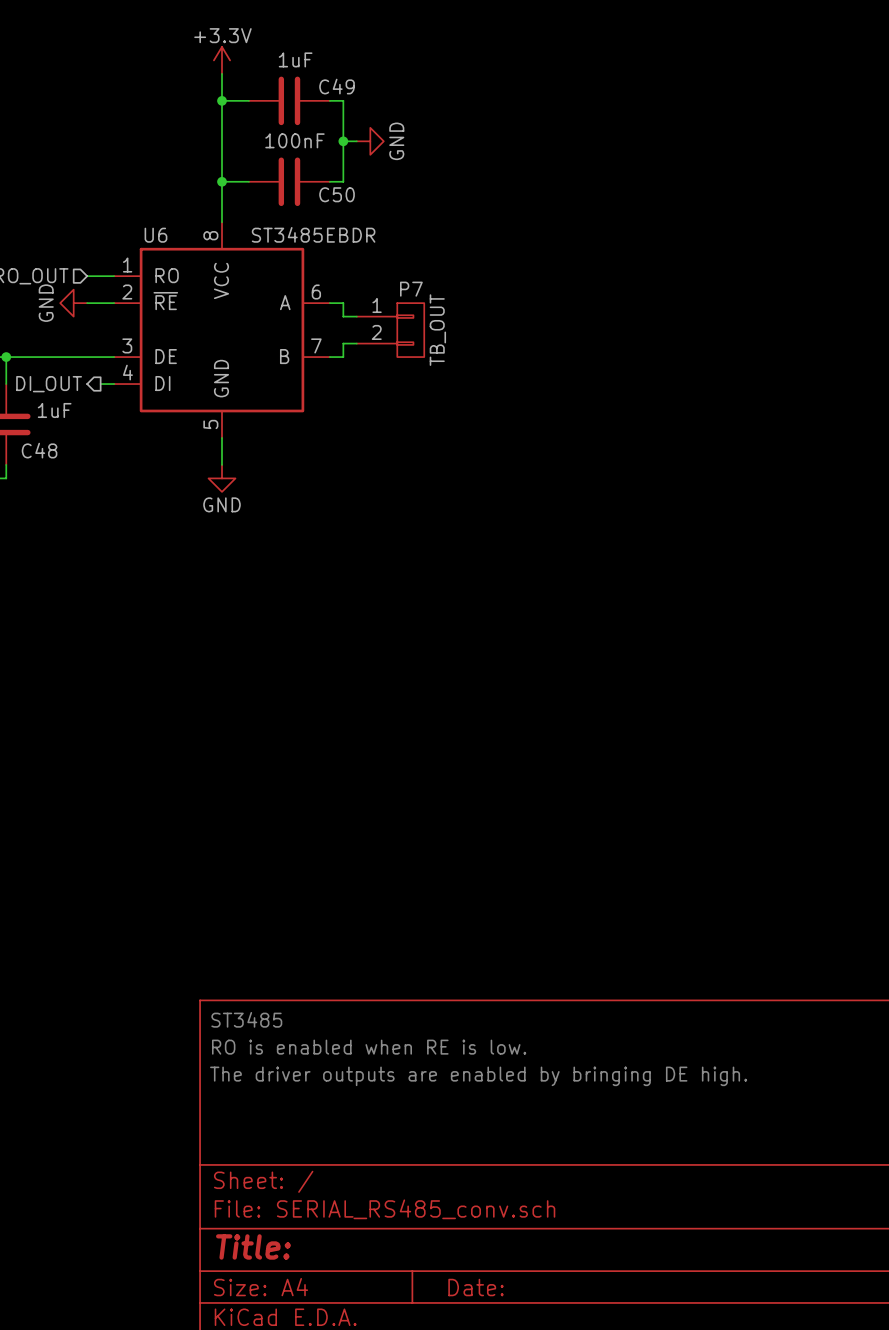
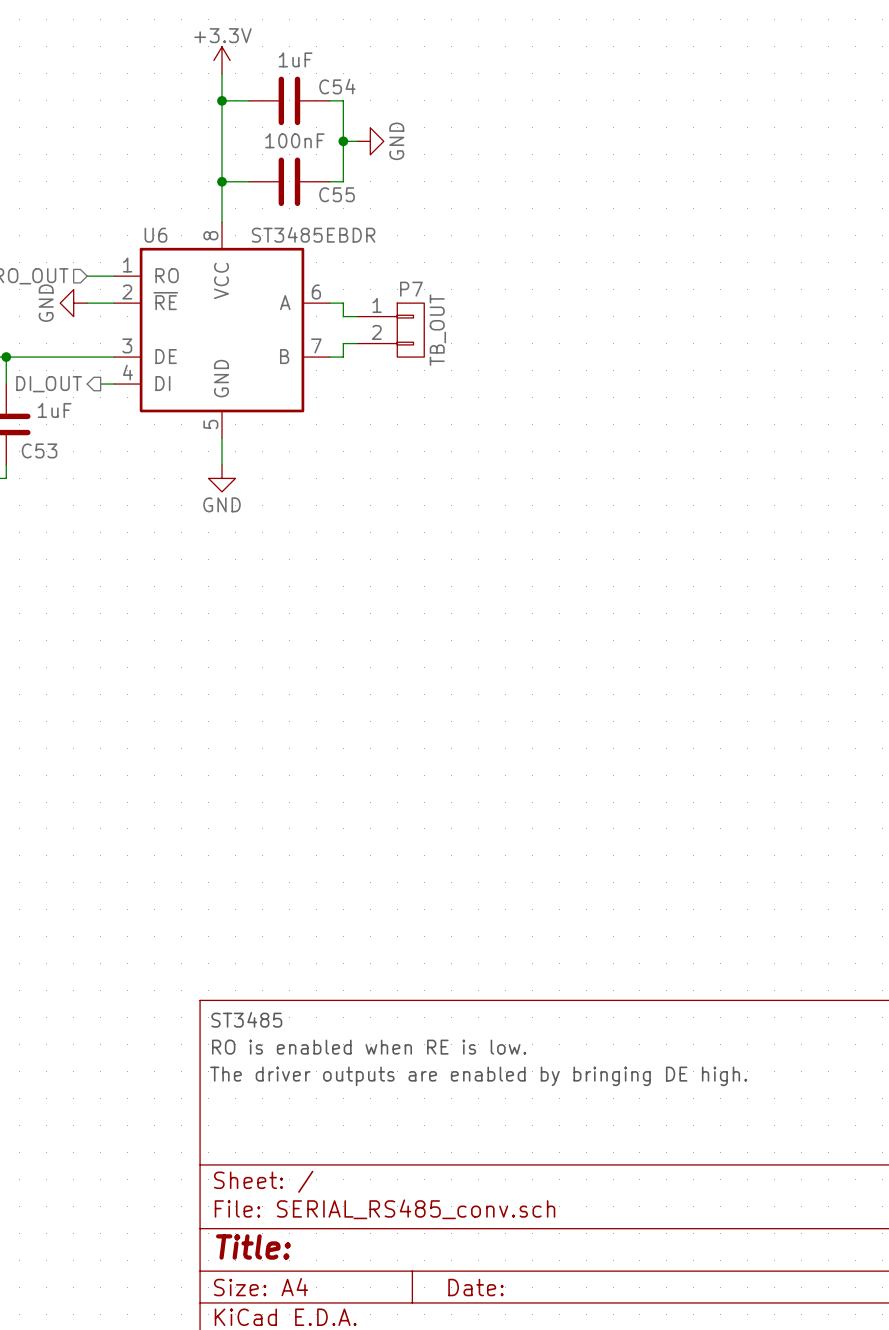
C49 name: C49 (337, 86) -> C54 (337, 86)
C50 name: C50 (337, 194) -> C55 (337, 194)
C48 name: C48 (39, 450) -> C53 (39, 450)

